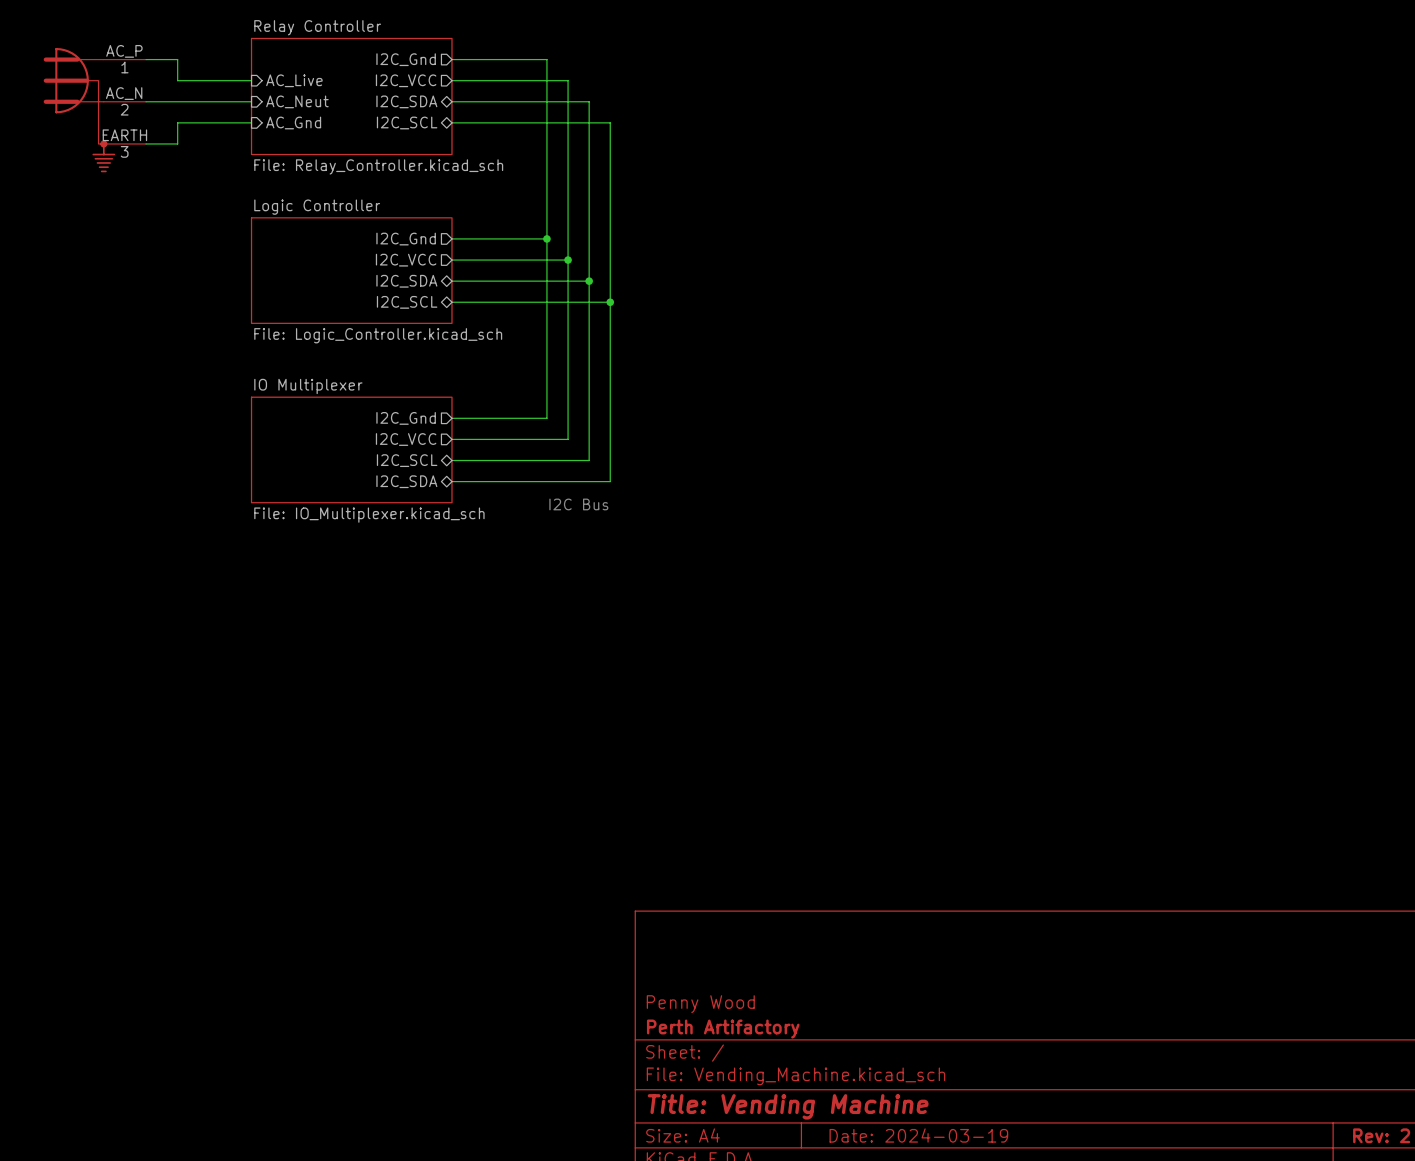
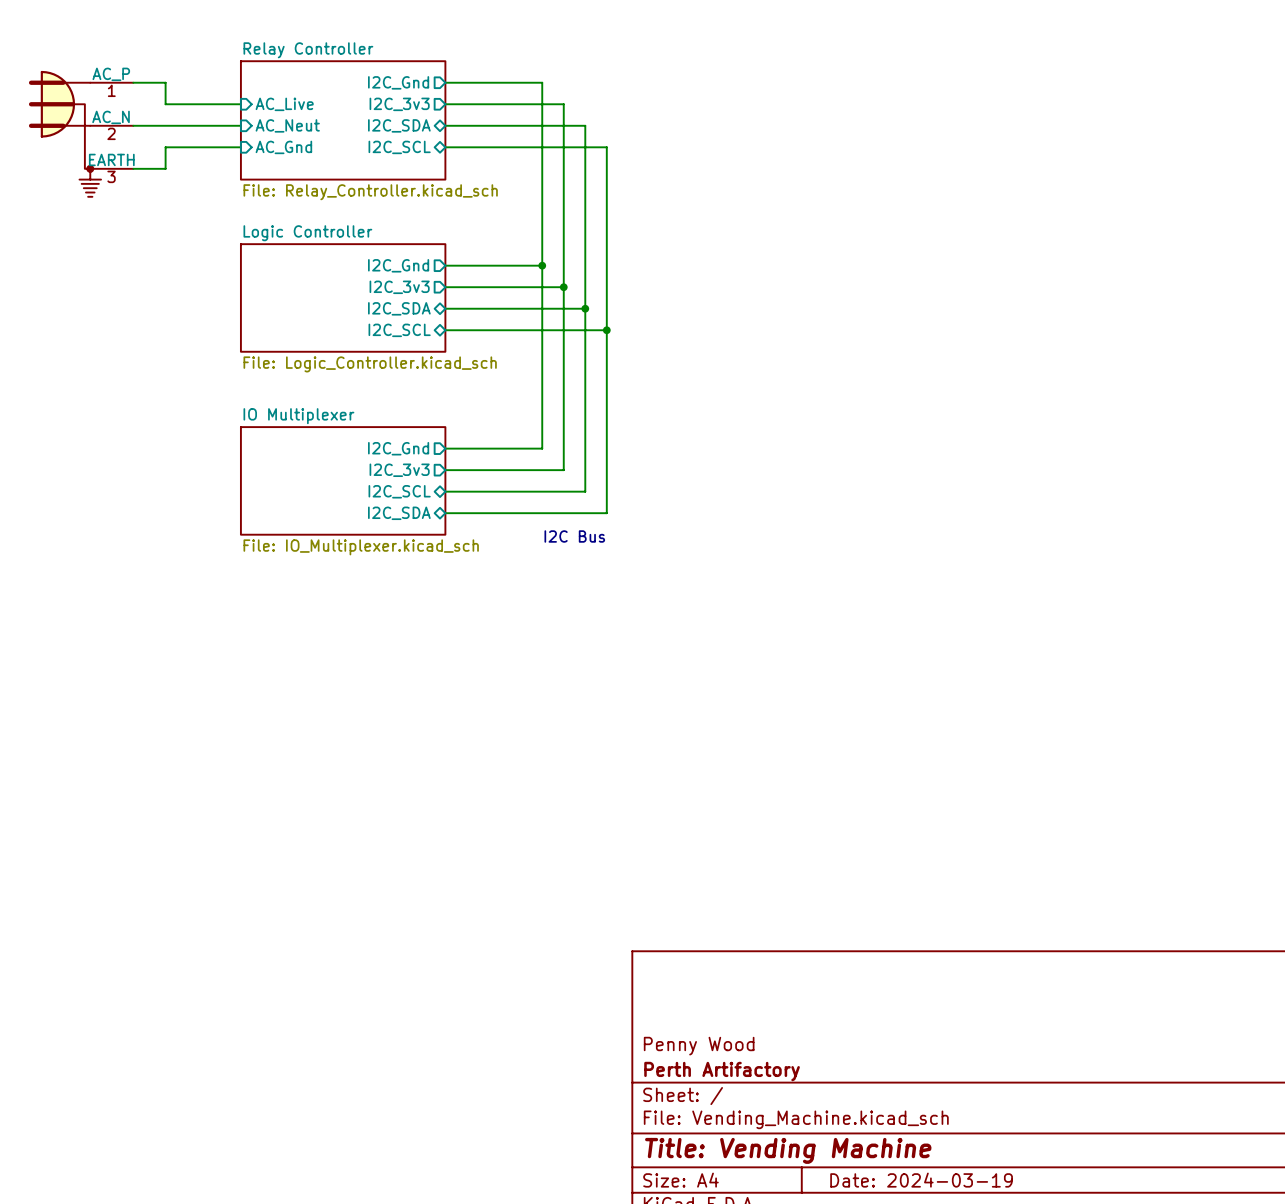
sheet pin: I2C_VCC (406, 80) -> I2C_3v3 (399, 104)
sheet pin: I2C_VCC (406, 260) -> I2C_3v3 (399, 287)
sheet pin: I2C_VCC (406, 439) -> I2C_3v3 (399, 470)

